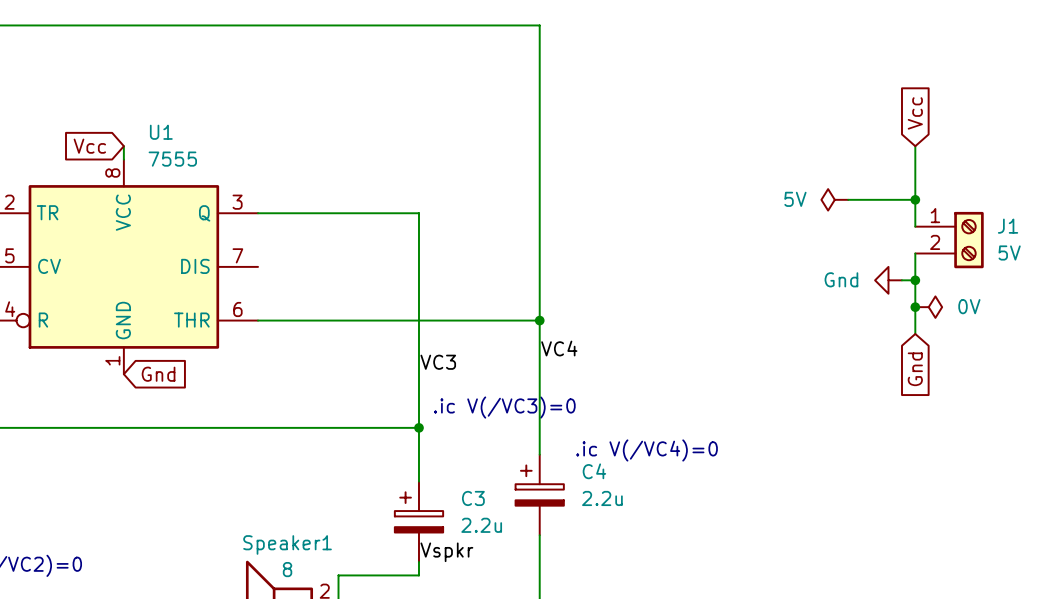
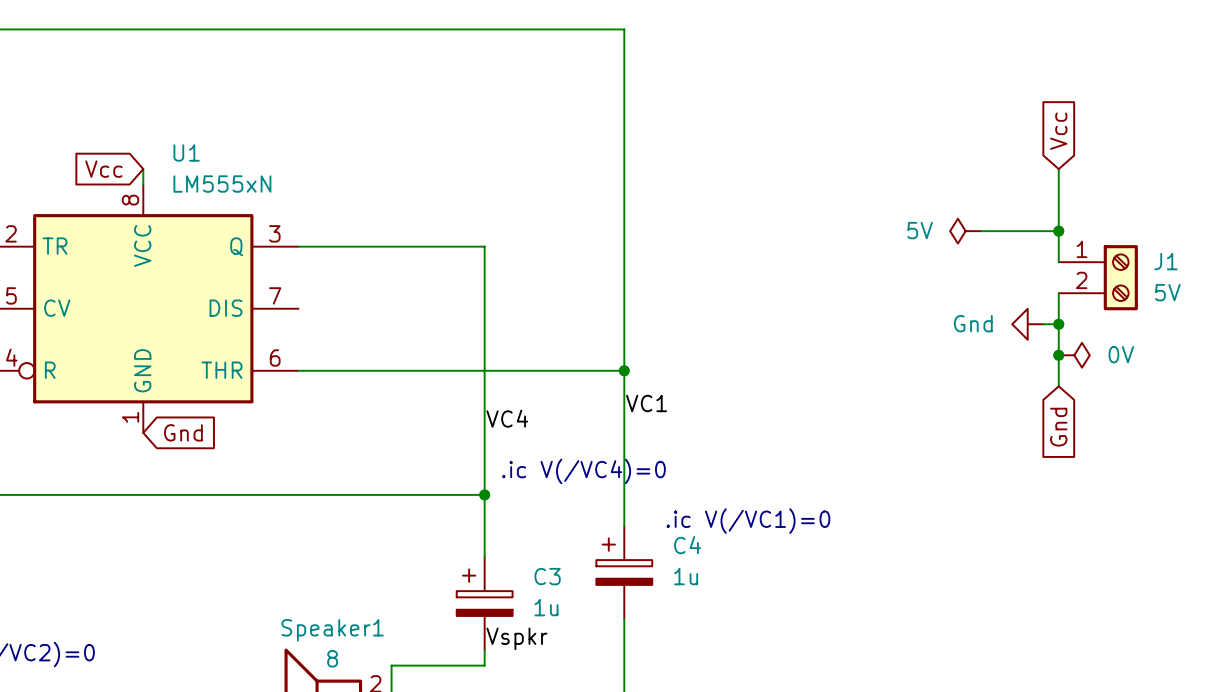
U1 value: 7555 (172, 159) -> LM555xN (222, 184)
label: VC4 (559, 348) -> VC1 (646, 403)
label: VC3 (438, 362) -> VC4 (507, 418)
text: .ic V(/VC3)=0 (504, 407) -> .ic V(/VC4)=0 (583, 471)
text: .ic V(/VC4)=0 (647, 450) -> .ic V(/VC1)=0 (748, 521)
C4 value: 2.2u (602, 498) -> 1u (686, 576)
C3 value: 2.2u (481, 525) -> 1u (546, 607)

